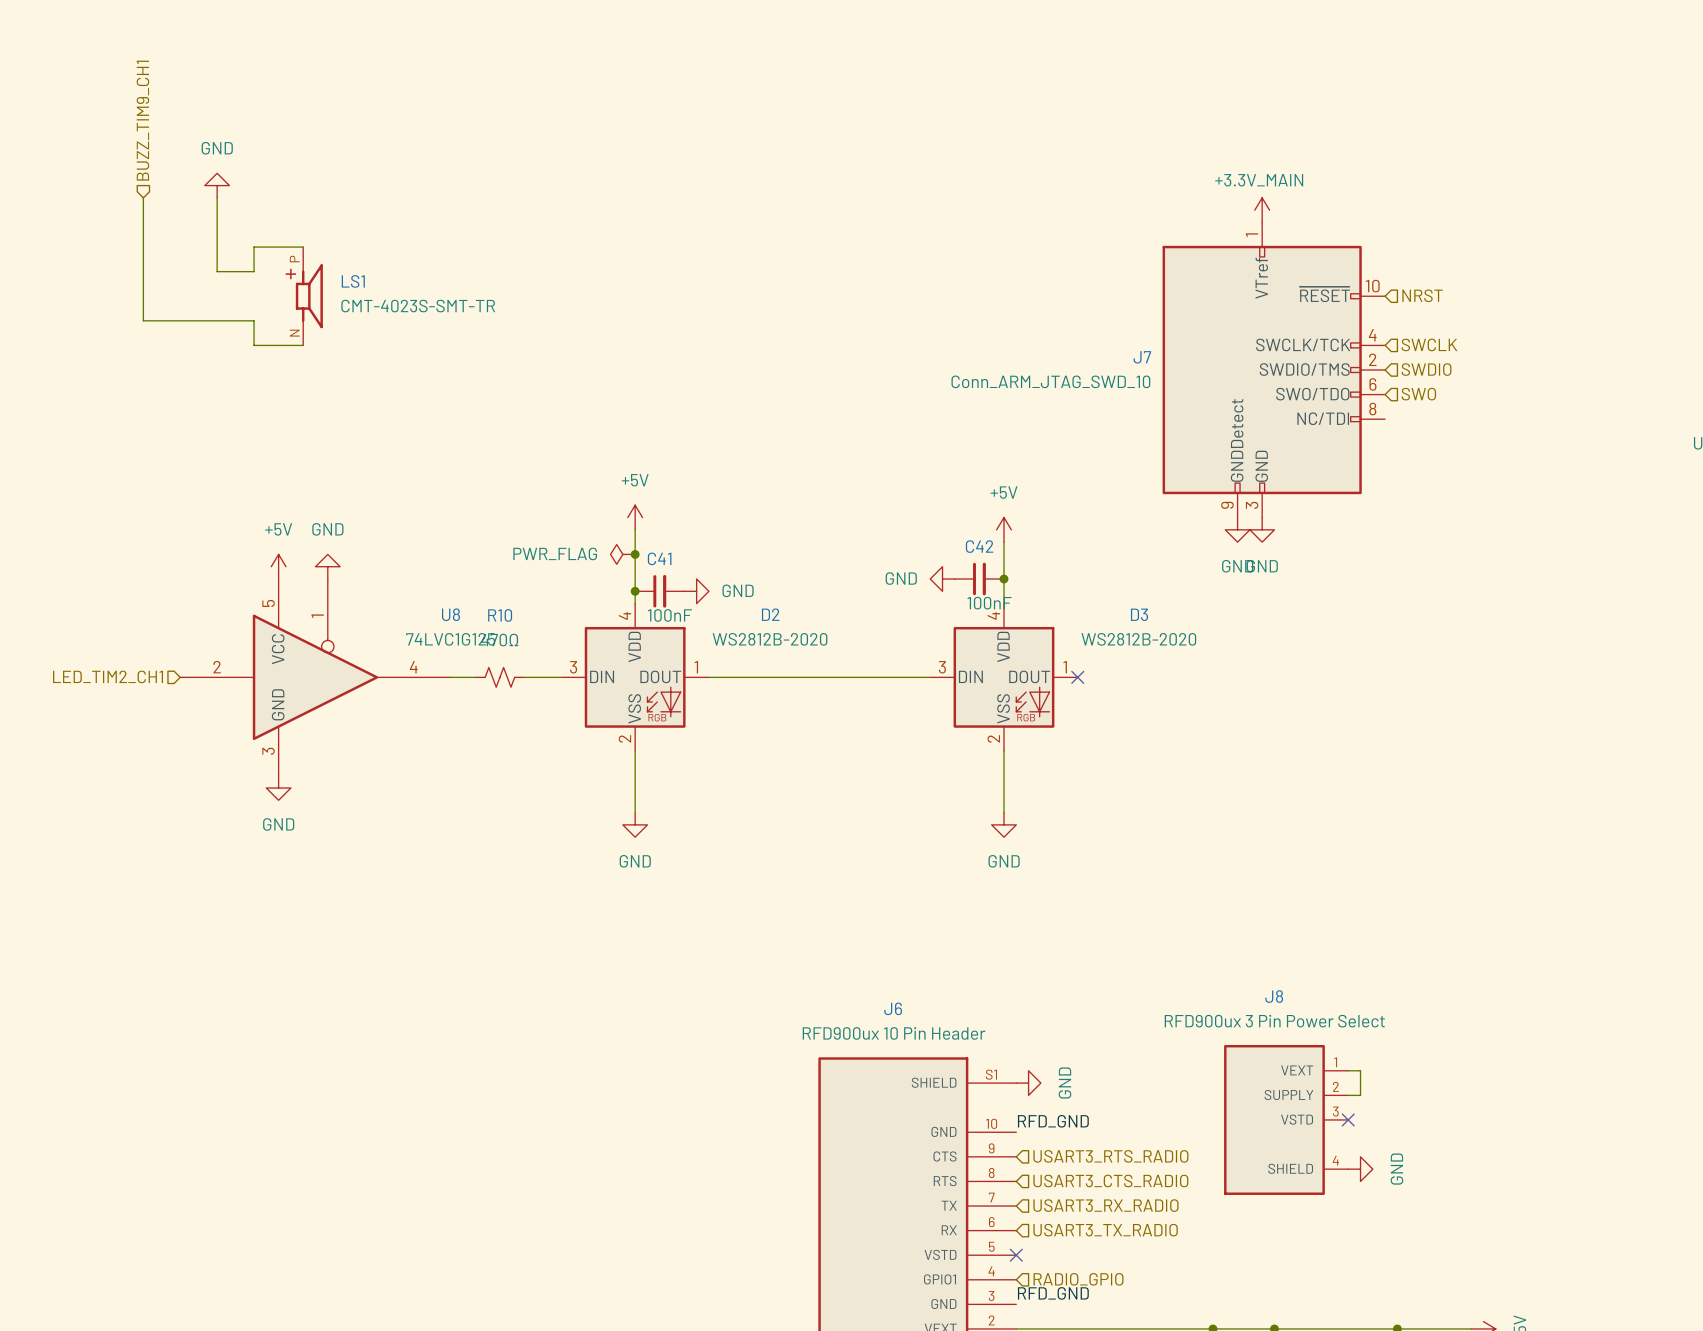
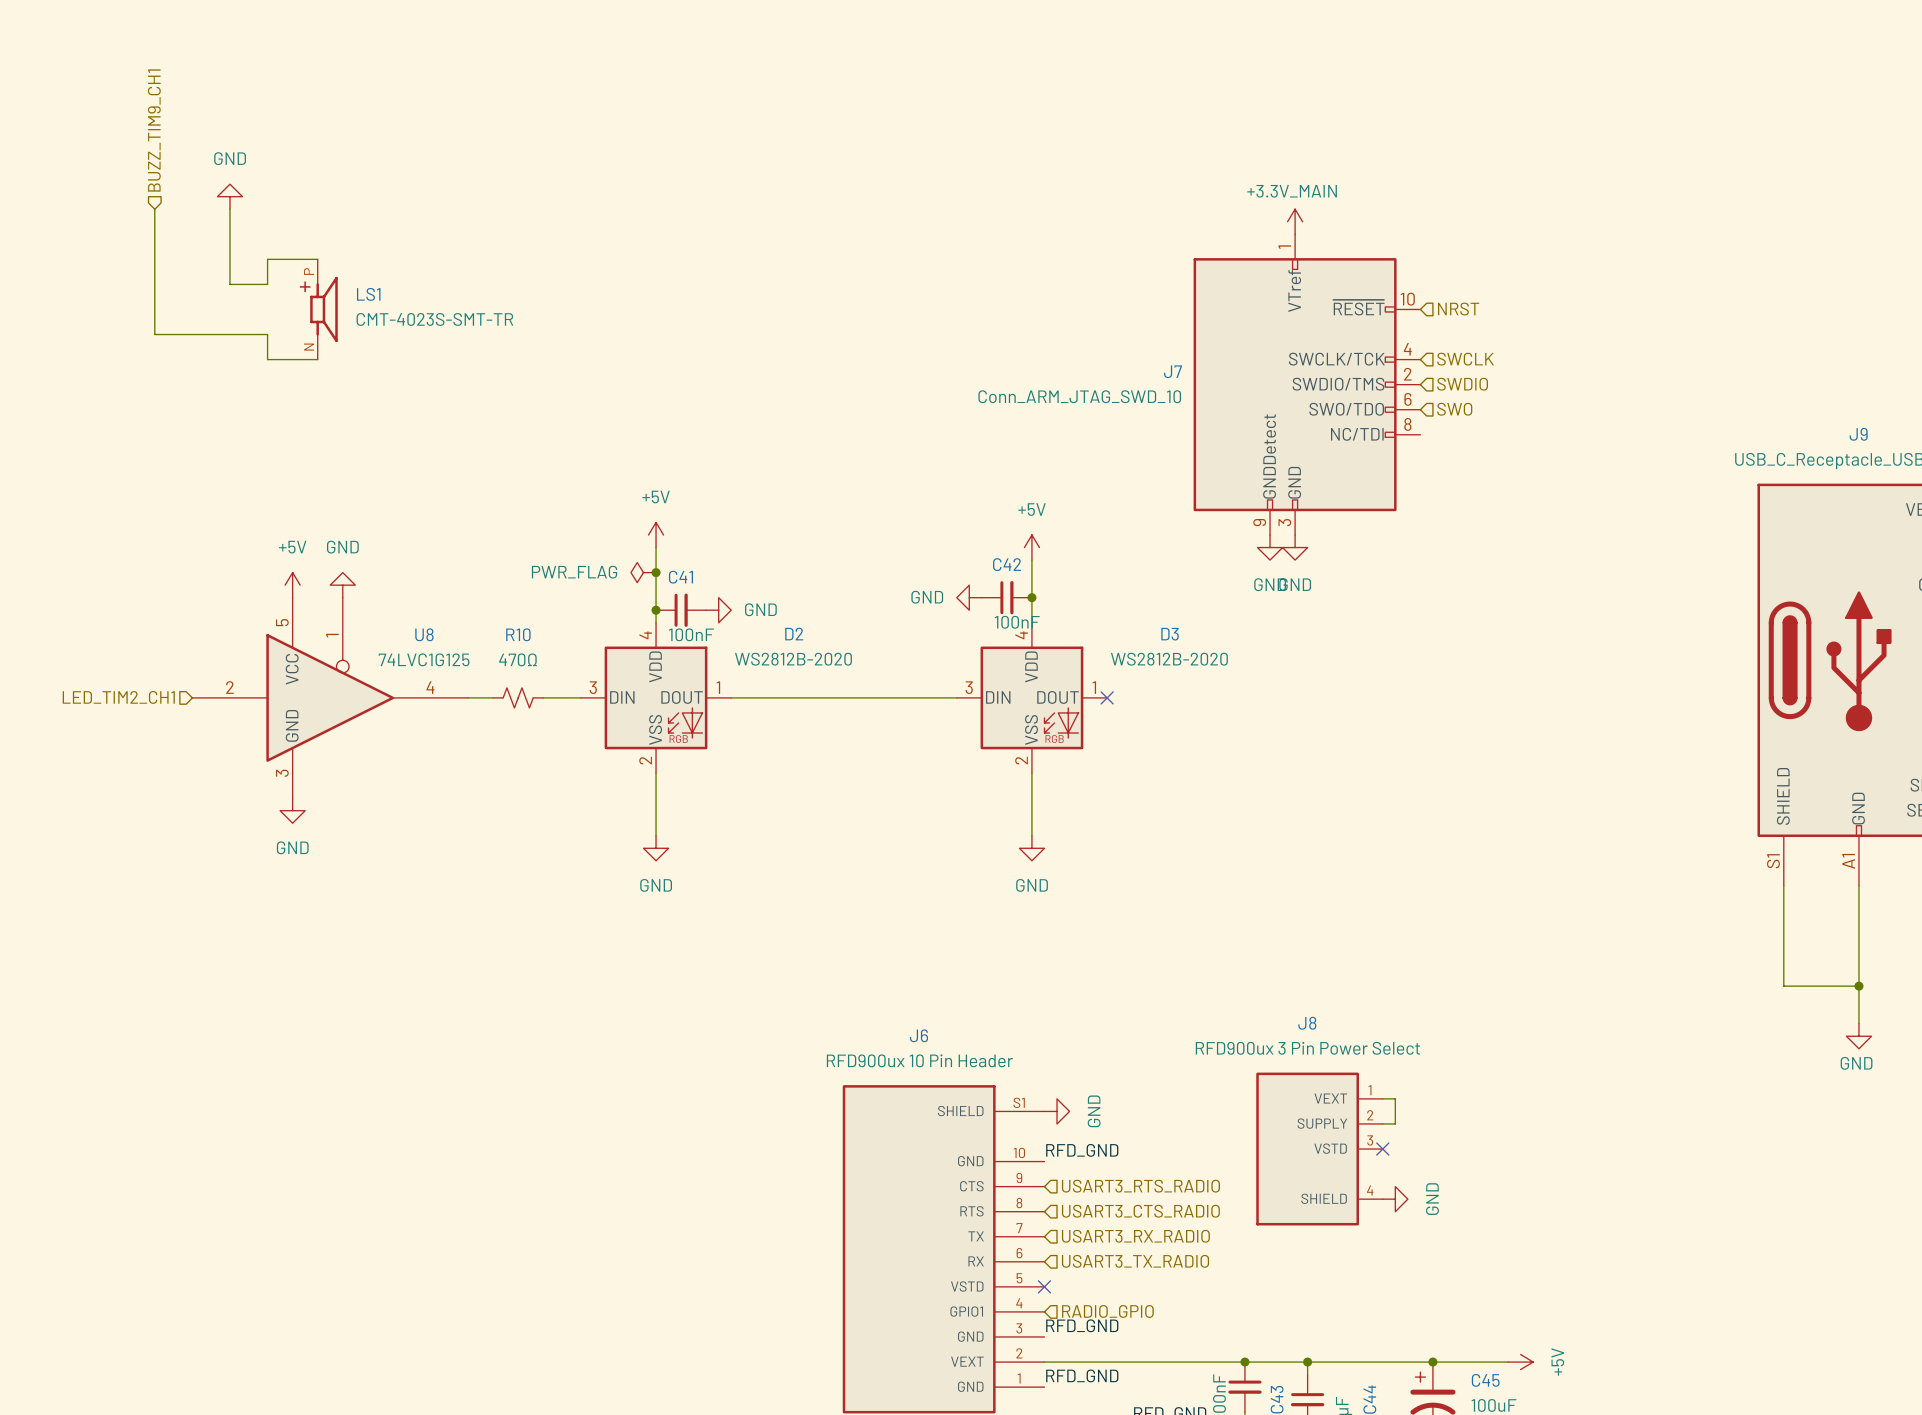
U8 name position: U8 (450, 614) -> U8 (424, 634)
U8 value position: 74LVC1G125 (450, 639) -> 74LVC1G125 (424, 659)

